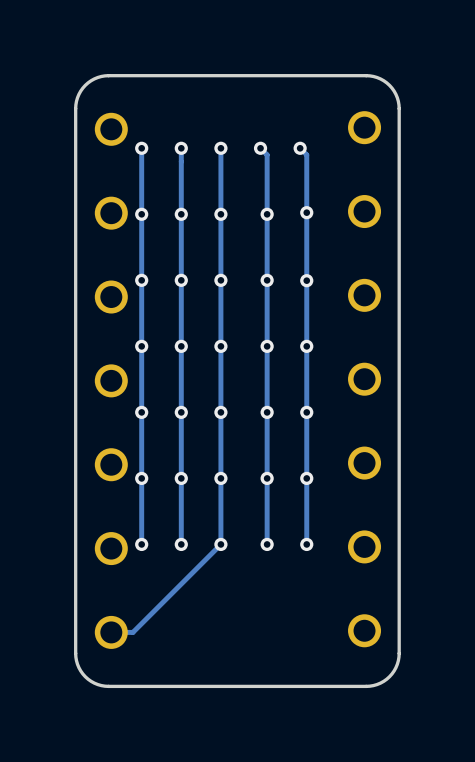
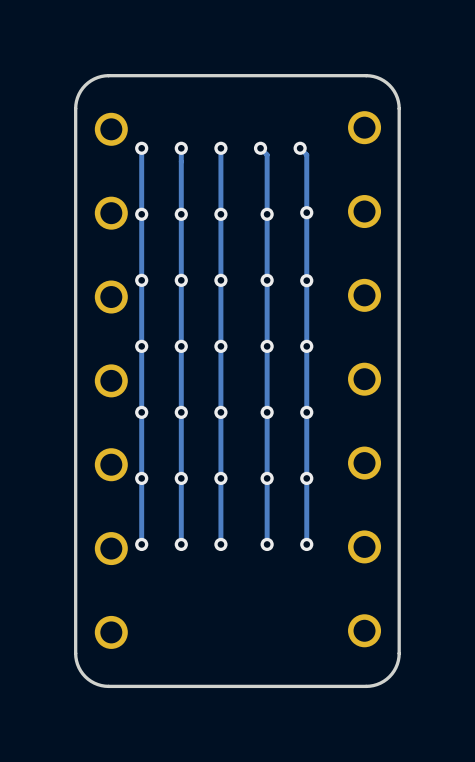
track: (220, 544) (132, 632) (111, 632) -> none

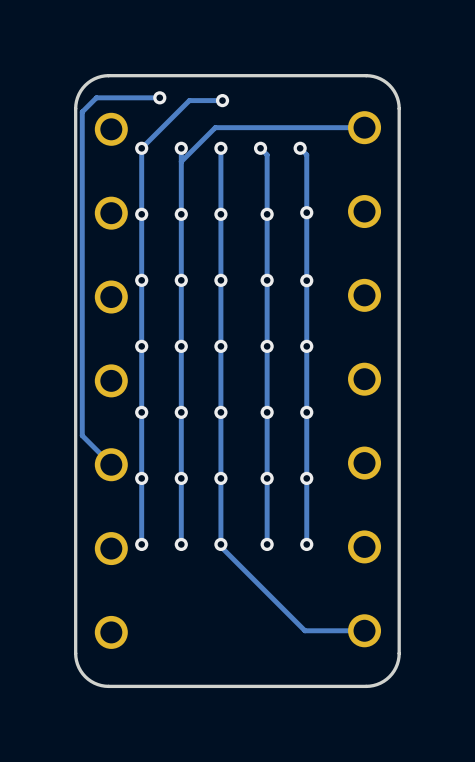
track: none -> (159, 97) (96, 97) (82, 111) (82, 435) (111, 464)
via: none -> (159, 97)
track: none -> (222, 100) (189, 100) (141, 148)
via: none -> (222, 100)
track: none -> (364, 127) (215, 127) (181, 161)
track: none -> (220, 546) (304, 630) (364, 630)

